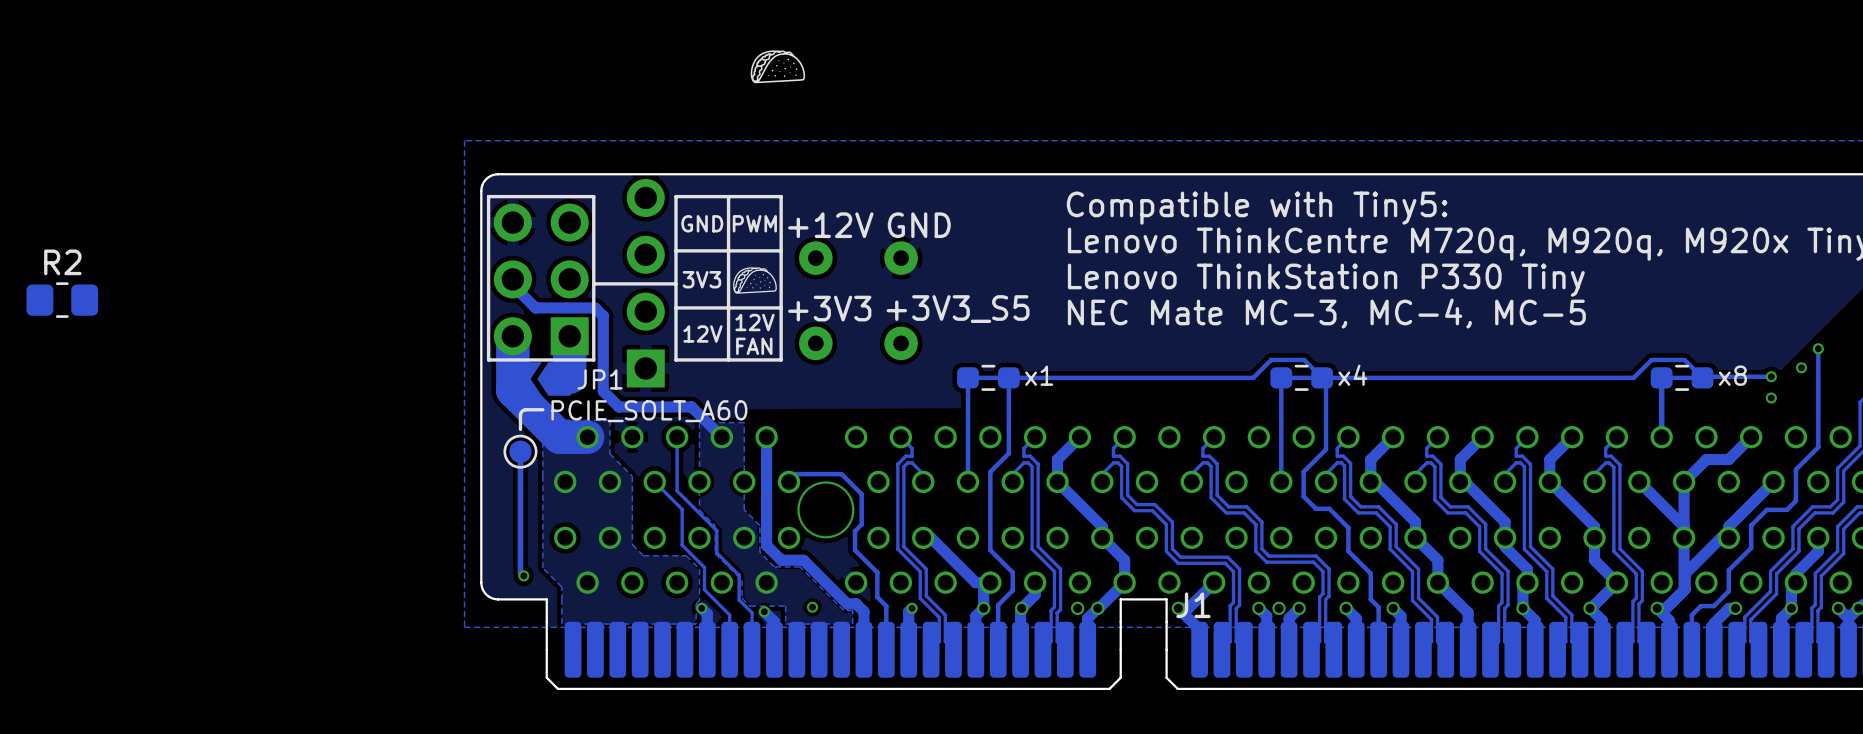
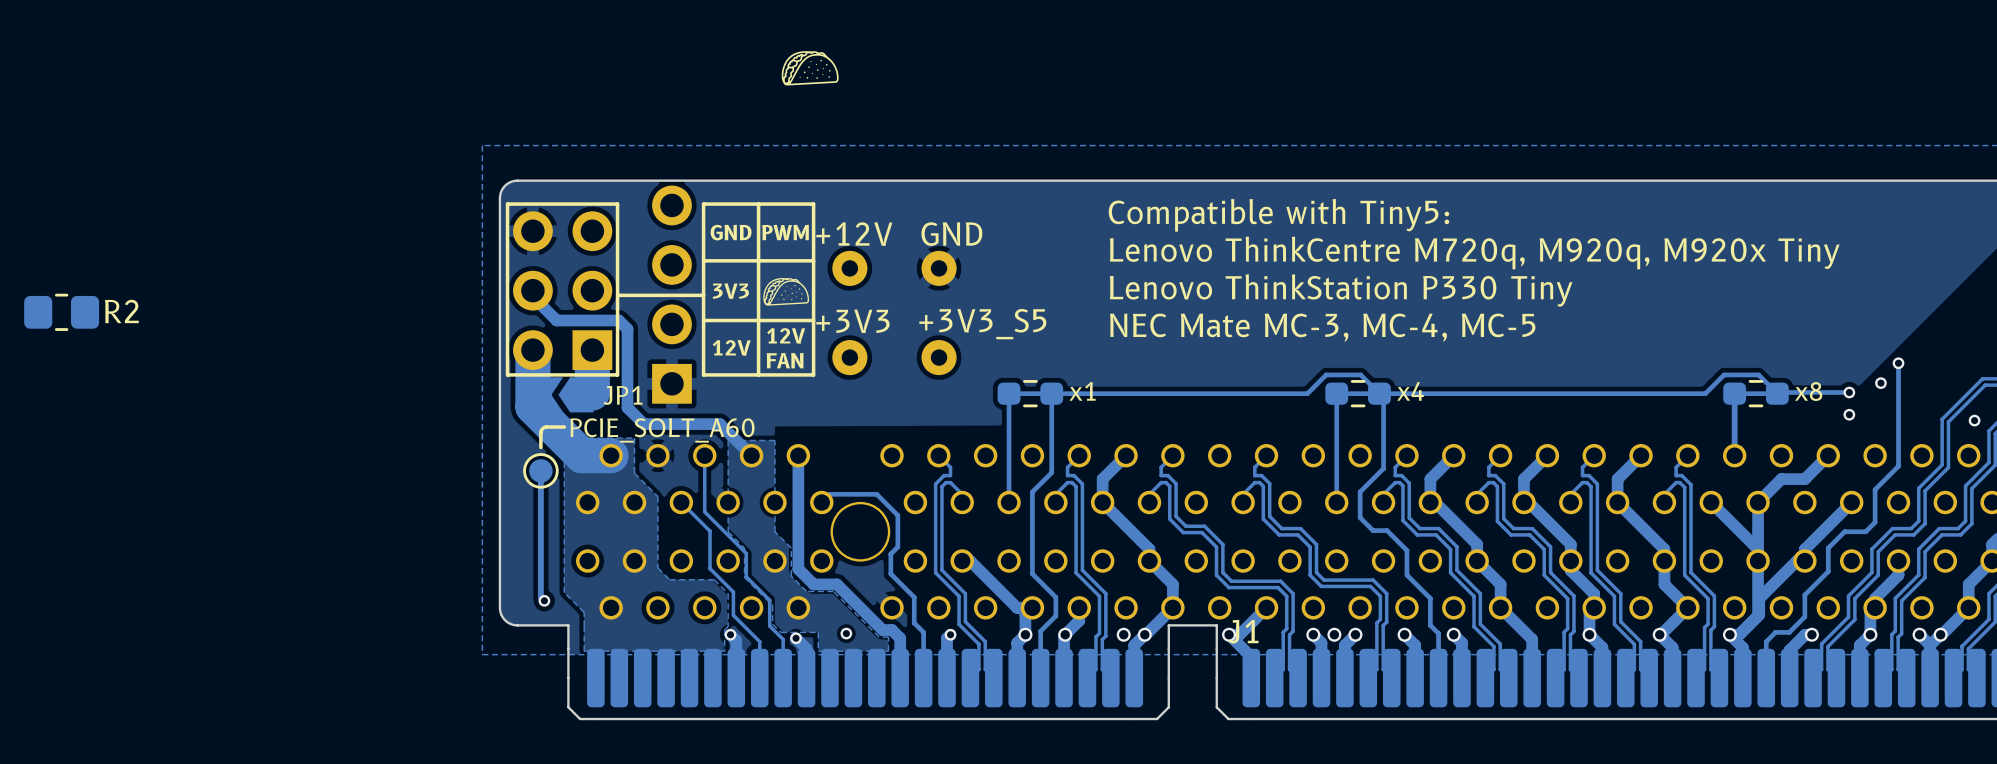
R2 name position: R2 (62, 262) -> R2 (121, 311)

